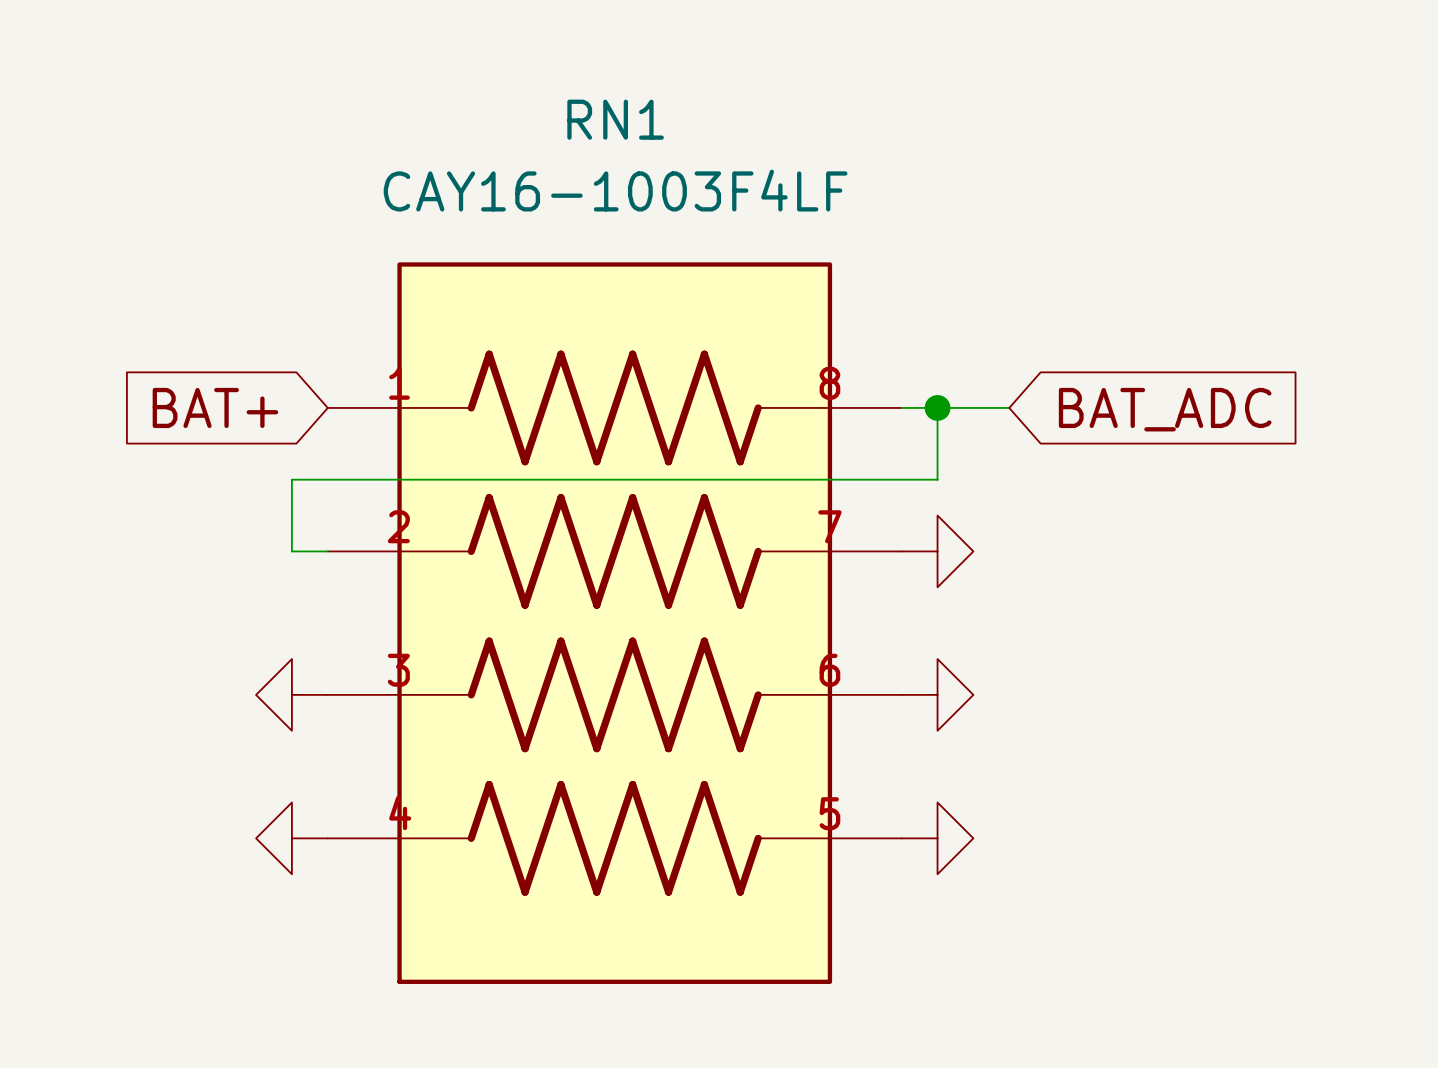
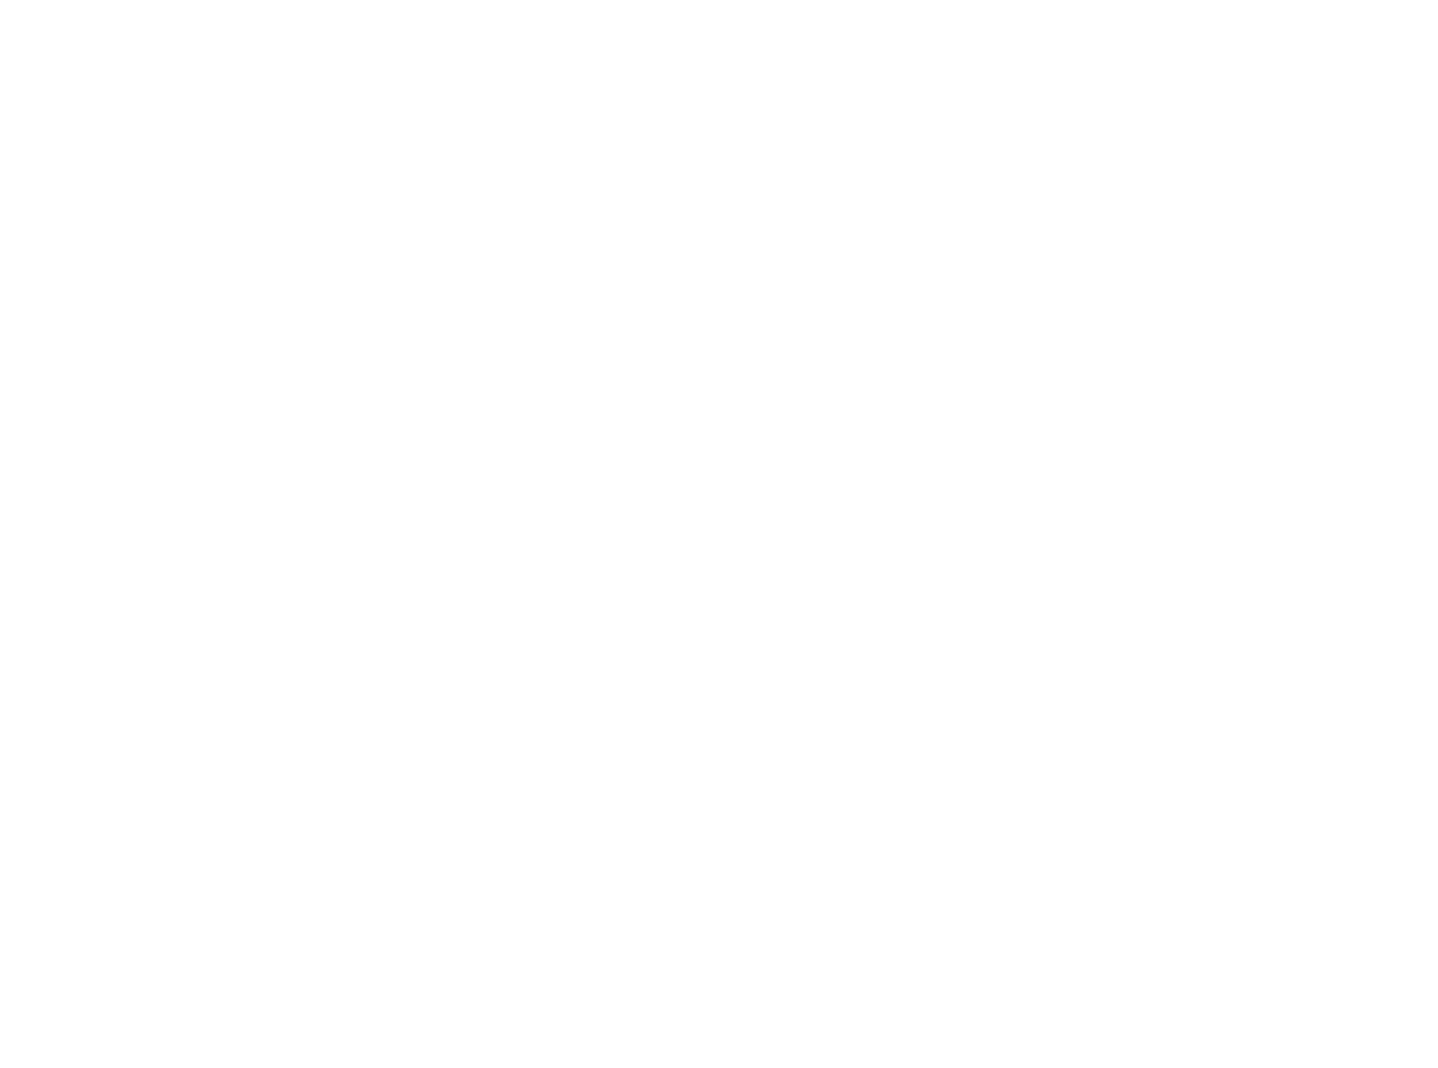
global label: BAT+ (215, 407) -> none
wire: (901, 407) (1009, 407) -> none
wire: (937, 407) (937, 479) (291, 479) (291, 551) (327, 551) -> none
junction: (937, 407) -> none
global label: BAT_ADC (1165, 409) -> none
power symbol: (937, 551) -> none
RN1: CAY16-1003F4LF (614, 623) -> none
power symbol: (291, 694) -> none
power symbol: (937, 694) -> none
power symbol: (291, 838) -> none
power symbol: (937, 838) -> none

